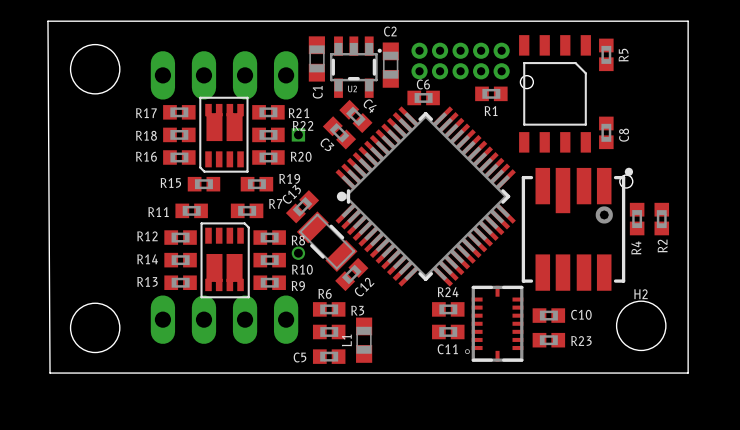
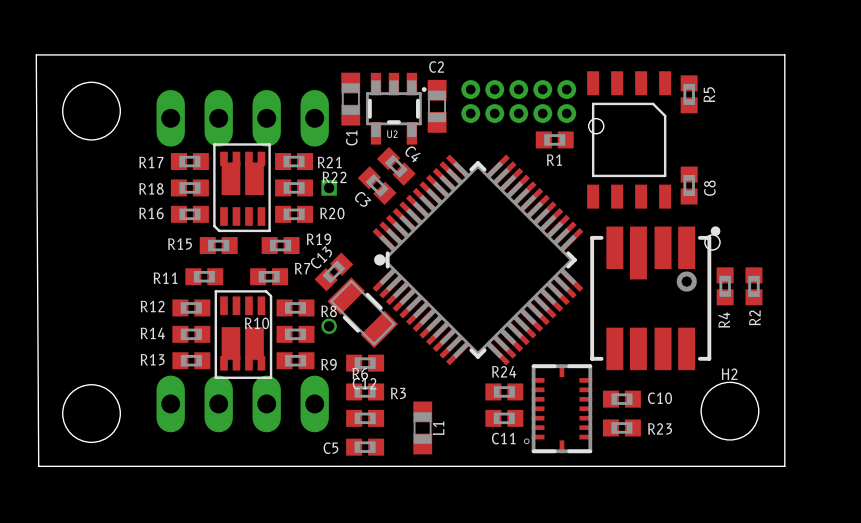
C6: (423, 97) -> none
R10 name position: R10 (302, 269) -> R10 (257, 323)
C12 rotation: 0° (351, 274) -> 45° clockwise (365, 363)
C12 position: (351, 274) -> (365, 363)
L1 name position: L1 (346, 340) -> L1 (438, 428)
L1 position: (364, 340) -> (422, 427)

